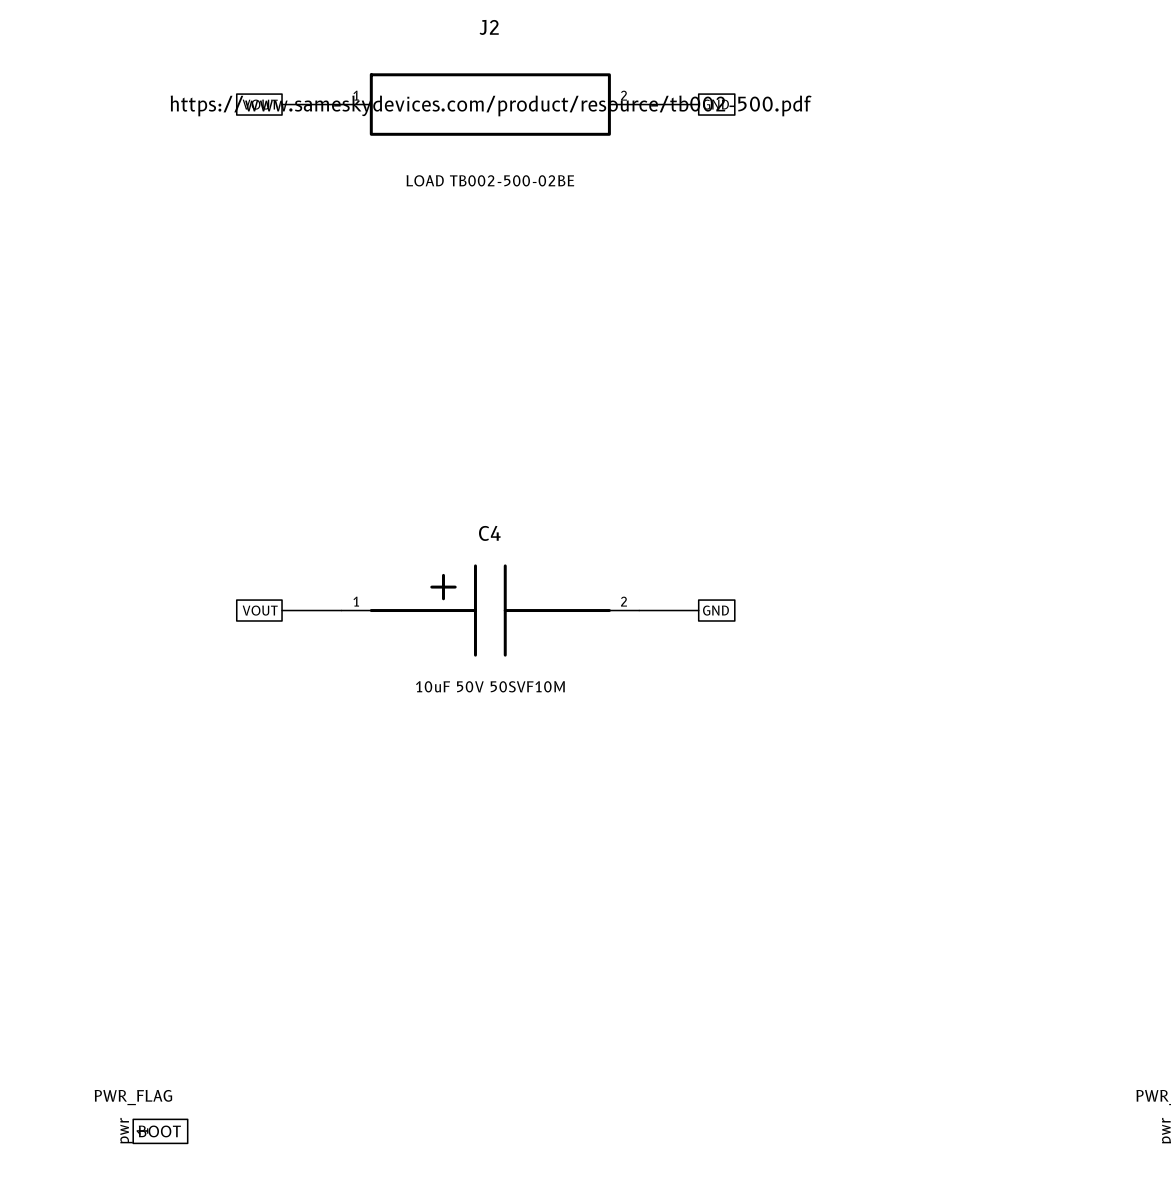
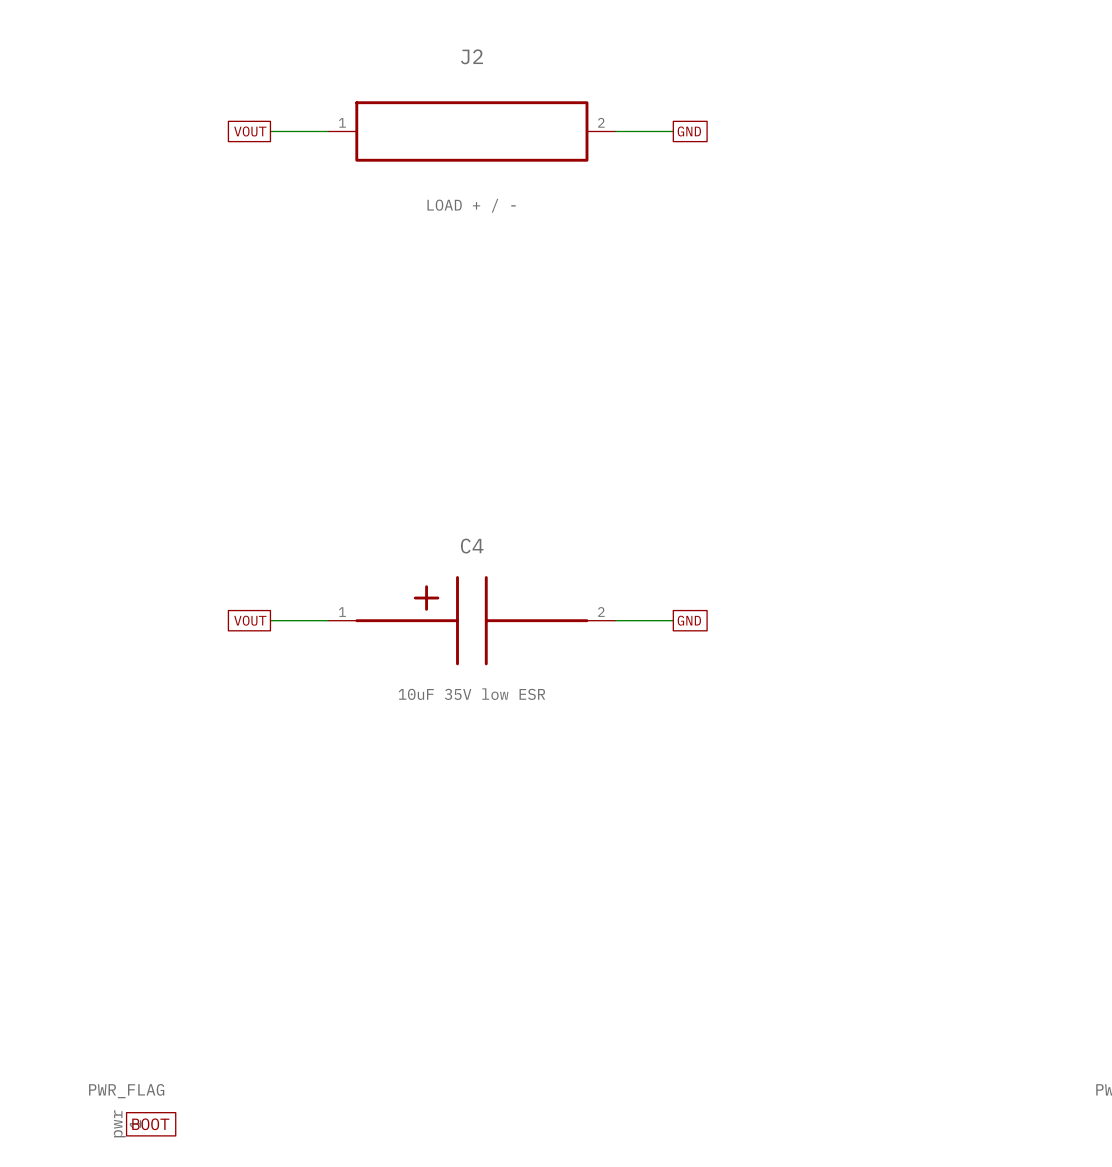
J2 text: https://www.sameskydevices.com/product/resource/tb002-500.pdf (491, 105) -> none
J2 value: LOAD TB002-500-02BE (490, 180) -> LOAD + / - (471, 205)
C4 value: 10uF 50V 50SVF10M (490, 686) -> 10uF 35V low ESR (471, 694)

